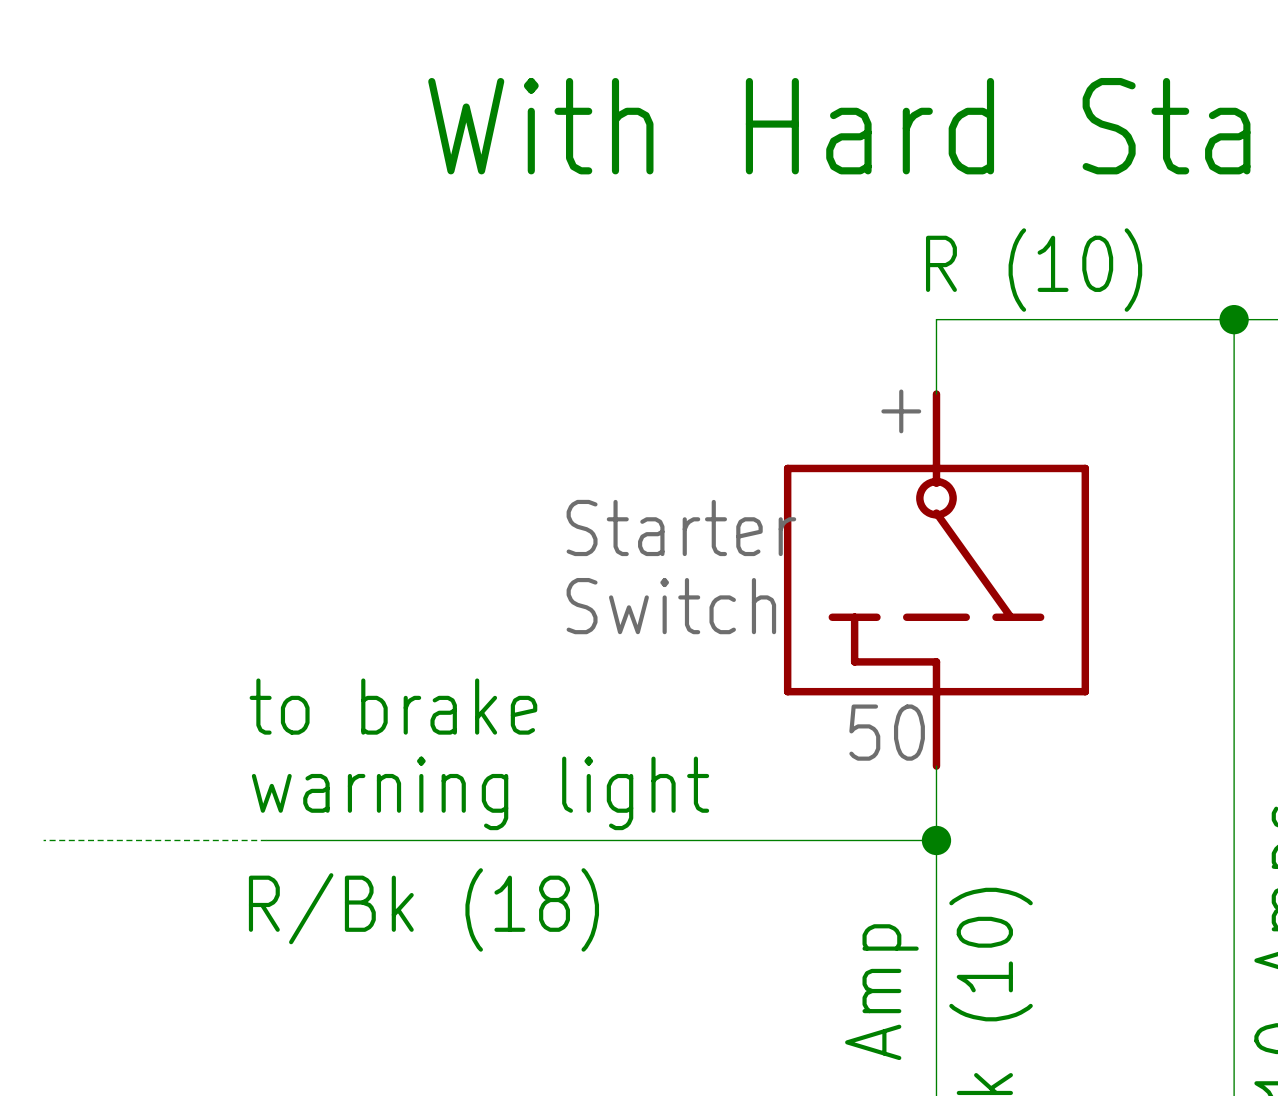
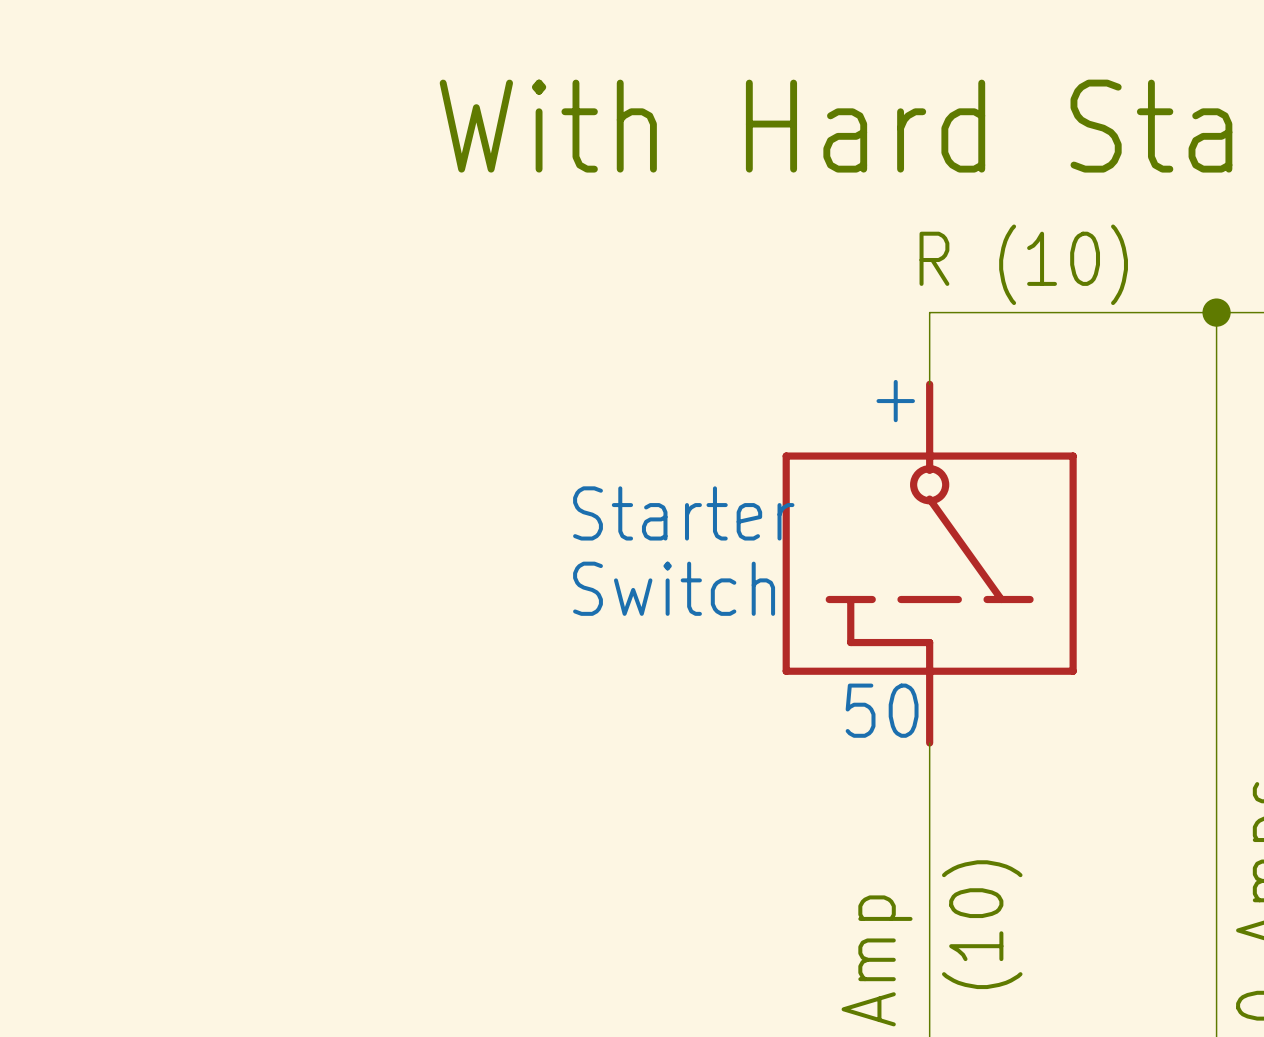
text: to brake (393, 706) -> none
text: warning light (480, 793) -> none
wire: (43, 840) (936, 840) -> none
junction: (936, 840) -> none
text: R/Bk (18) (423, 909) -> none

